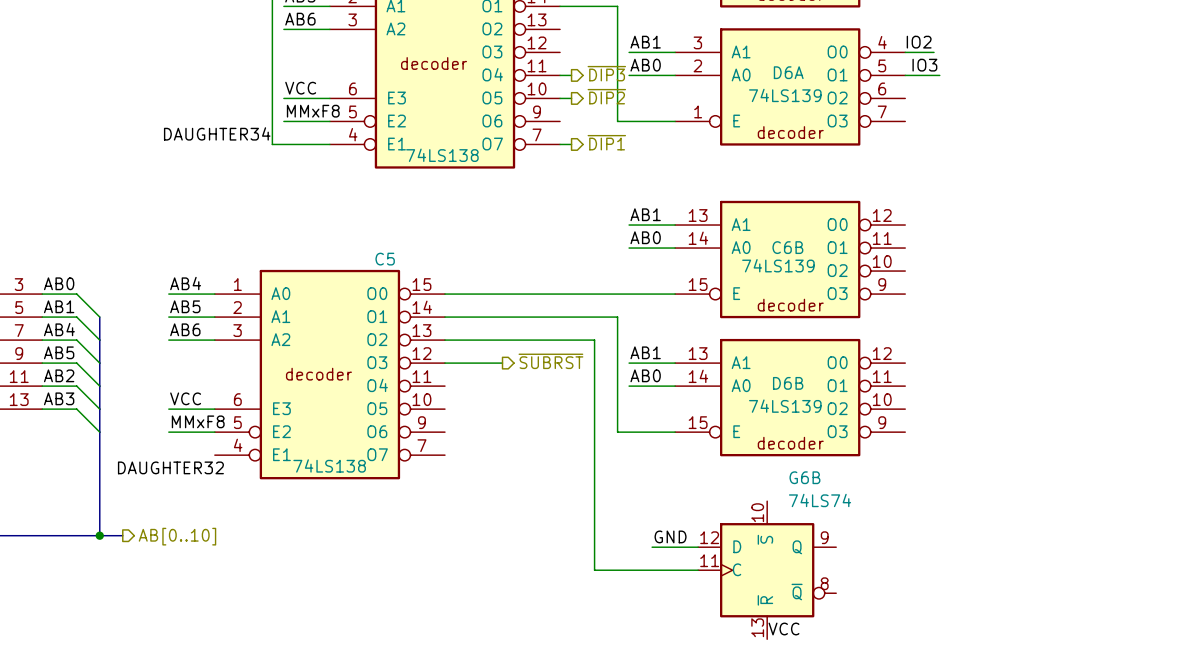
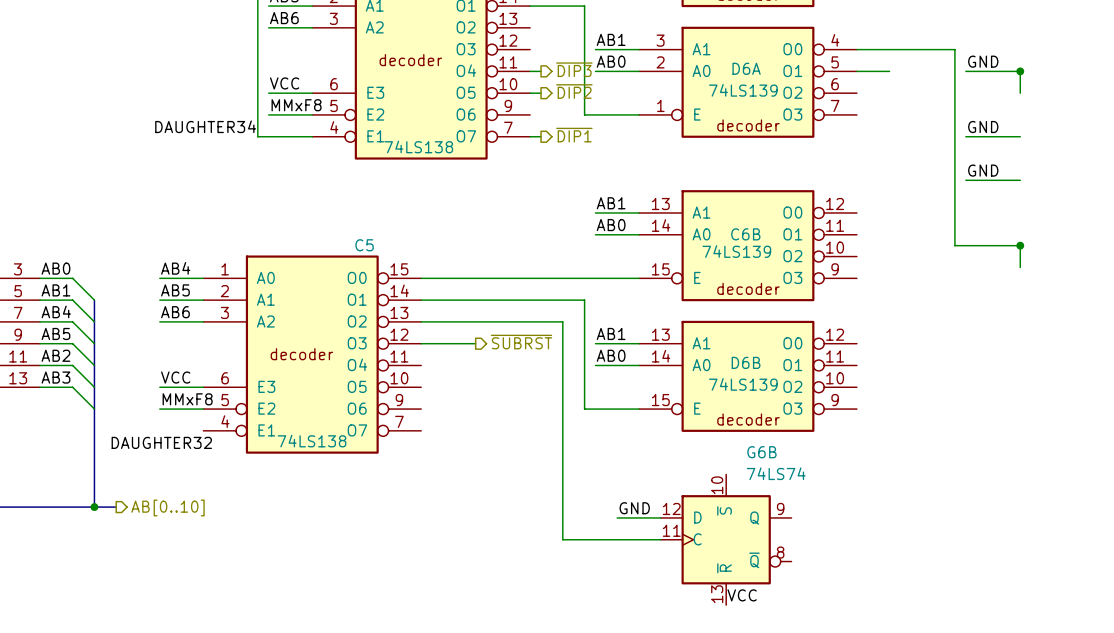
label: IO2 (919, 42) -> none
wire: none -> (884, 49) (954, 49) (954, 245) (1020, 245) (1020, 267)
label: IO3 (924, 65) -> none
label: none -> GND (983, 61)
wire: none -> (965, 71) (1020, 71) (1020, 93)
junction: none -> (1020, 71)
label: none -> GND (983, 127)
wire: none -> (965, 136) (1020, 136)
label: none -> GND (983, 170)
wire: none -> (965, 180) (1020, 180)
junction: none -> (1020, 245)

